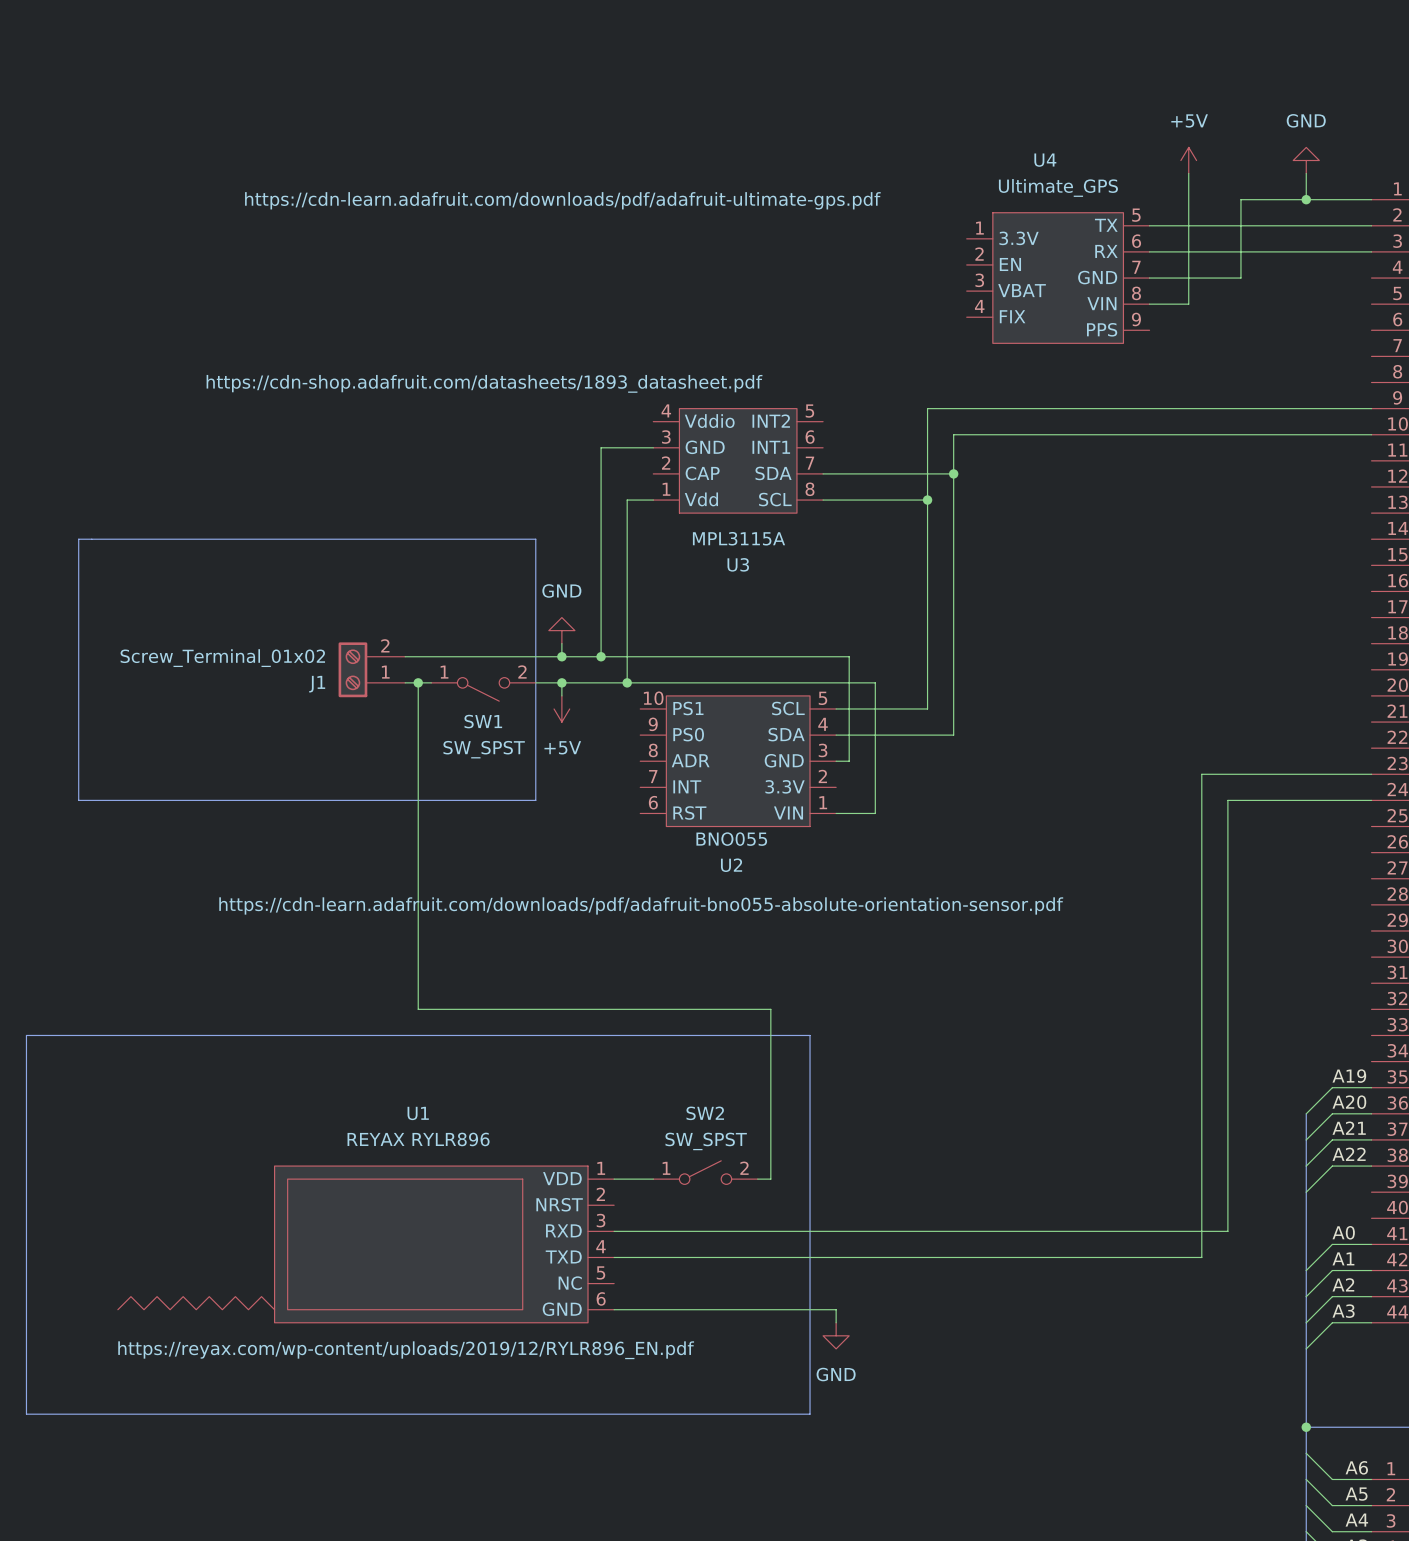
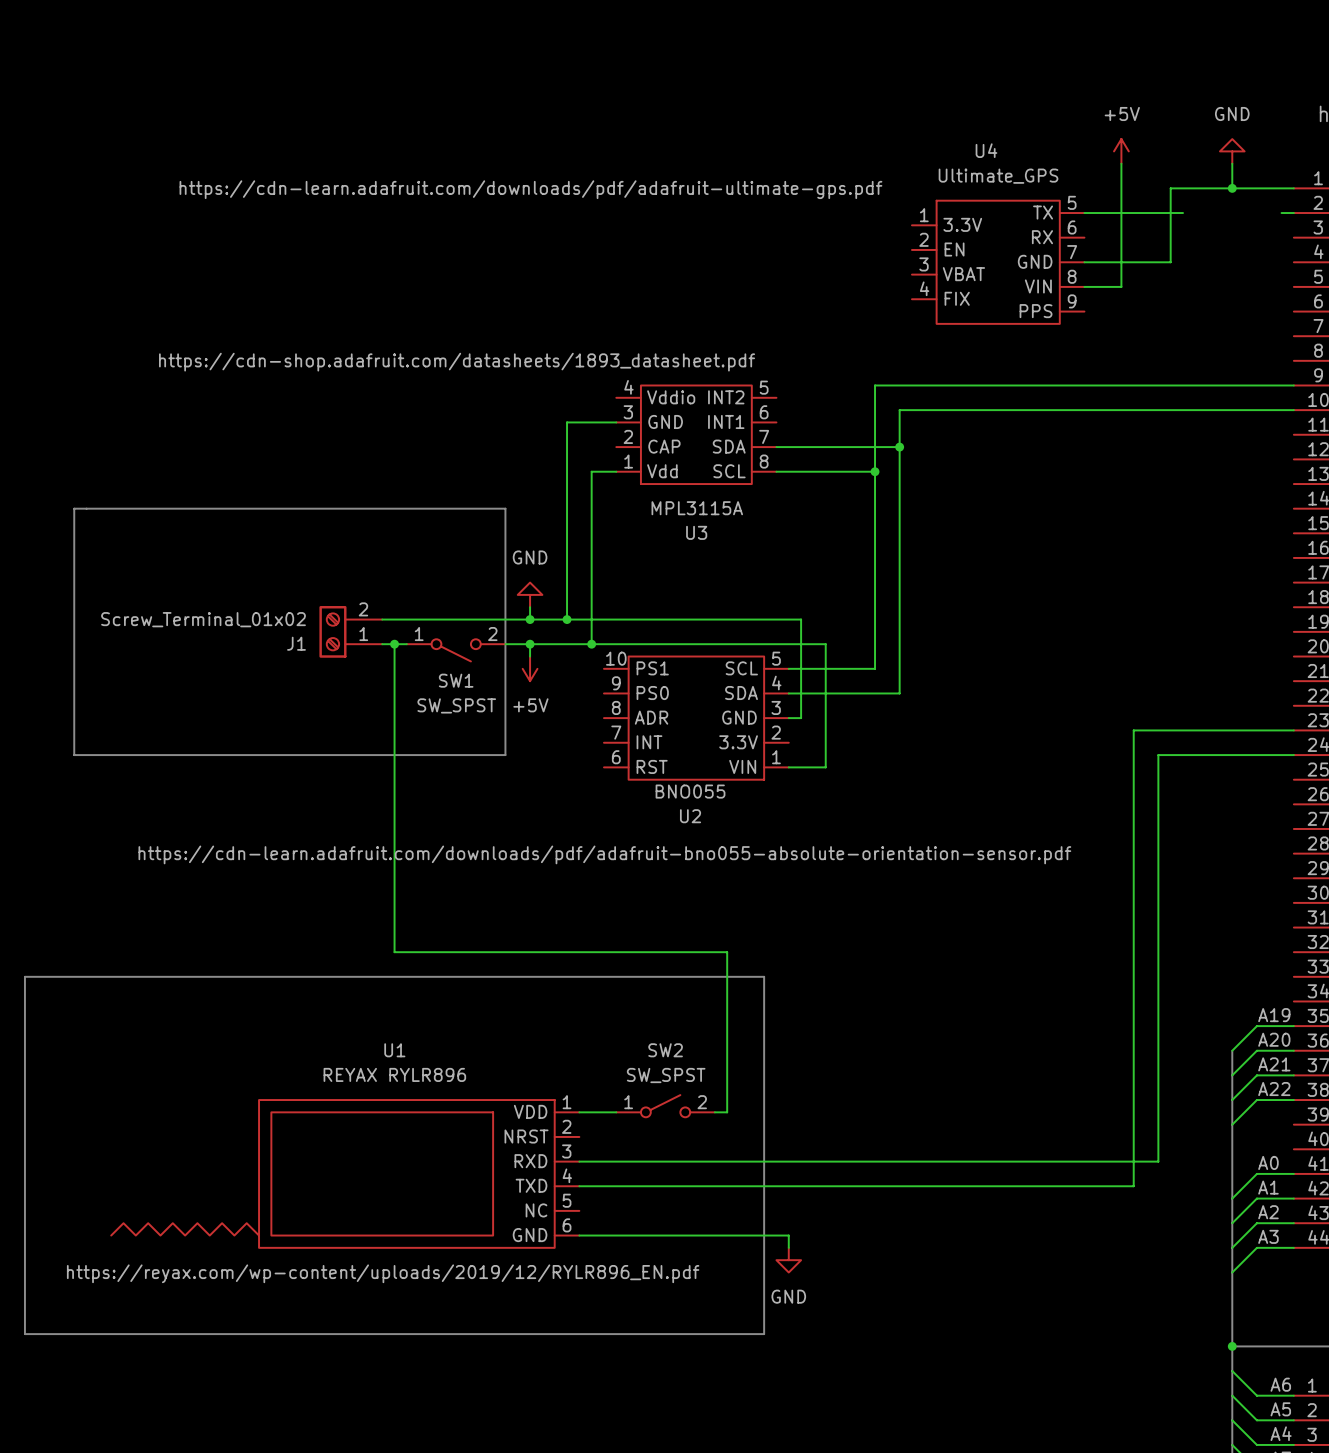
wire: (1254, 225) (1358, 225) -> none
wire: (1149, 251) (1371, 251) -> none

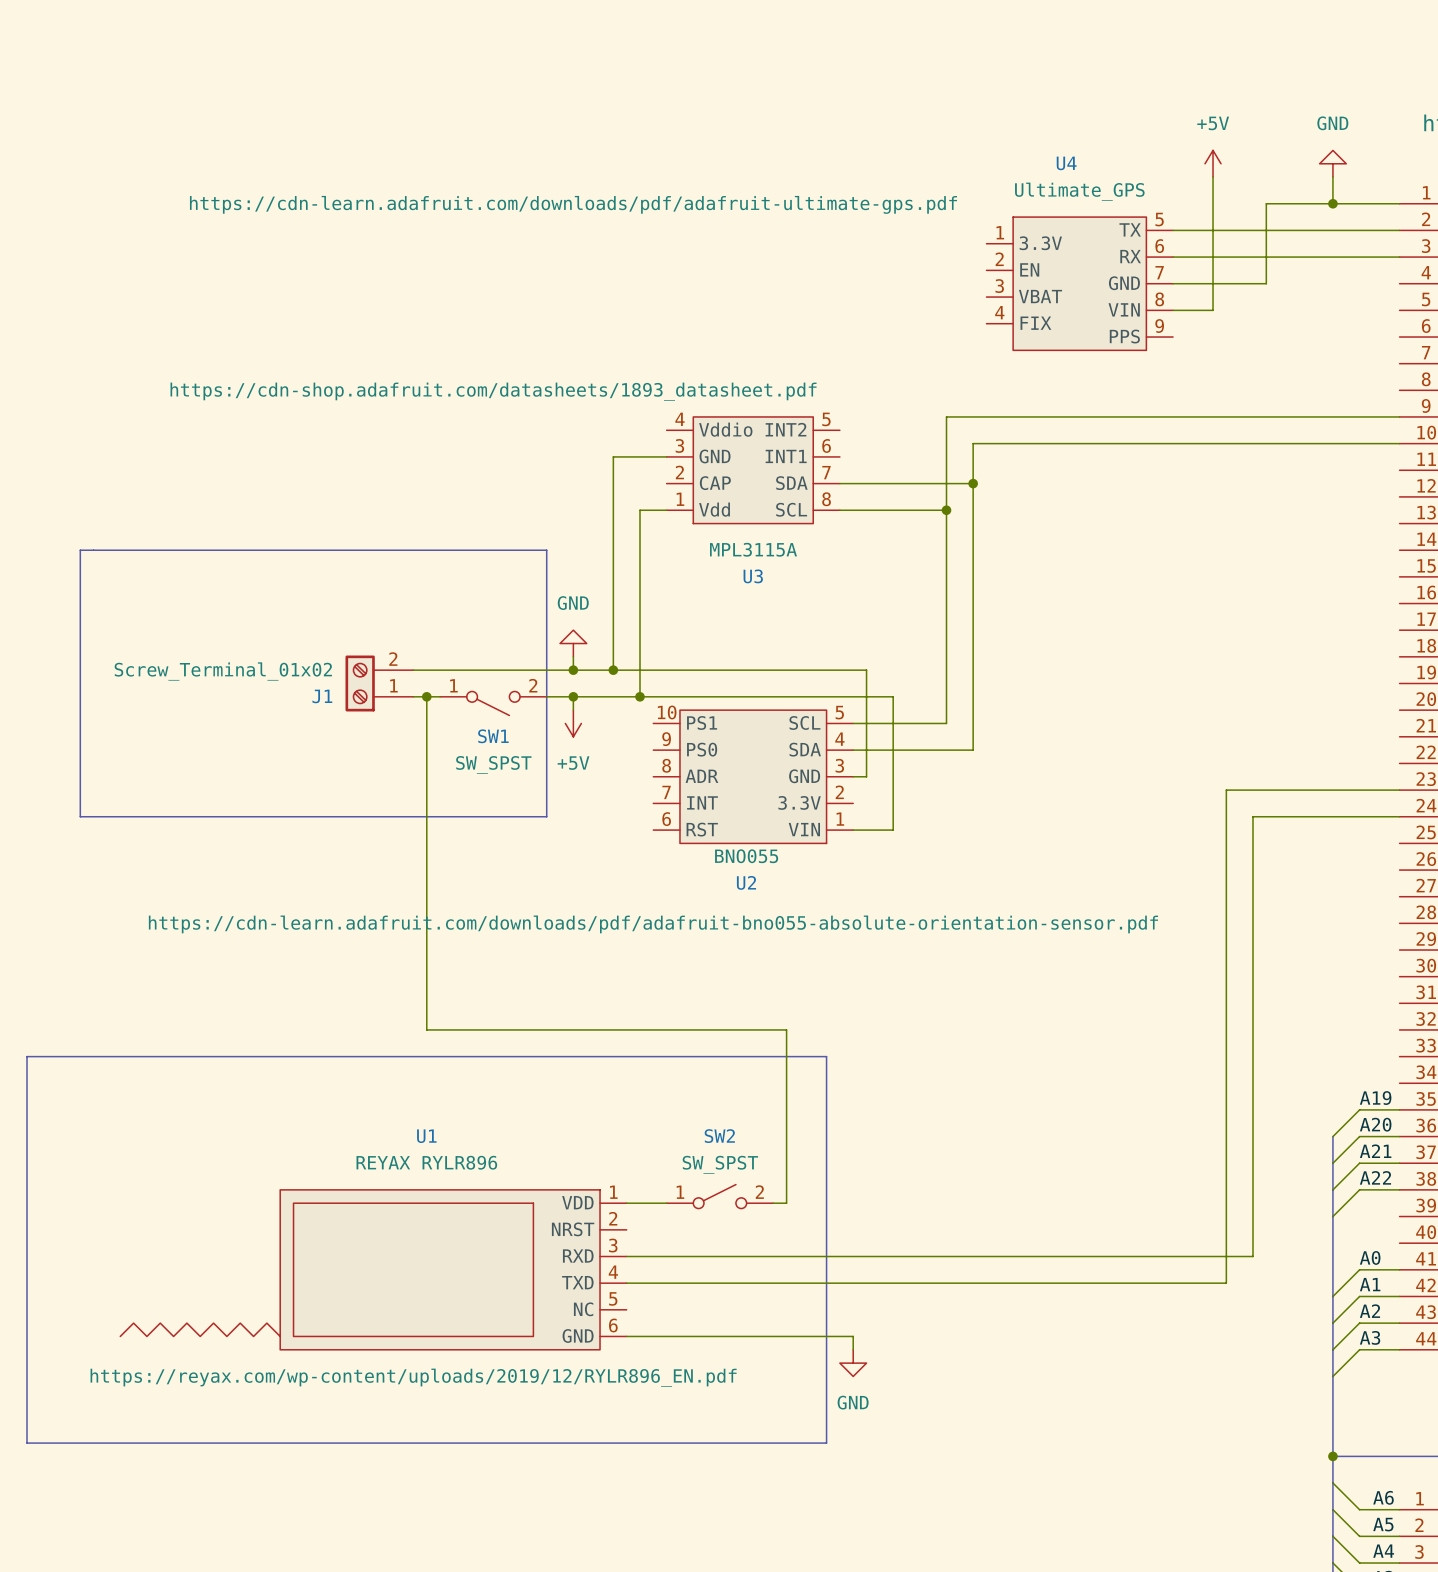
wire: none -> (1279, 230) (1386, 230)
wire: none -> (1173, 257) (1399, 257)

